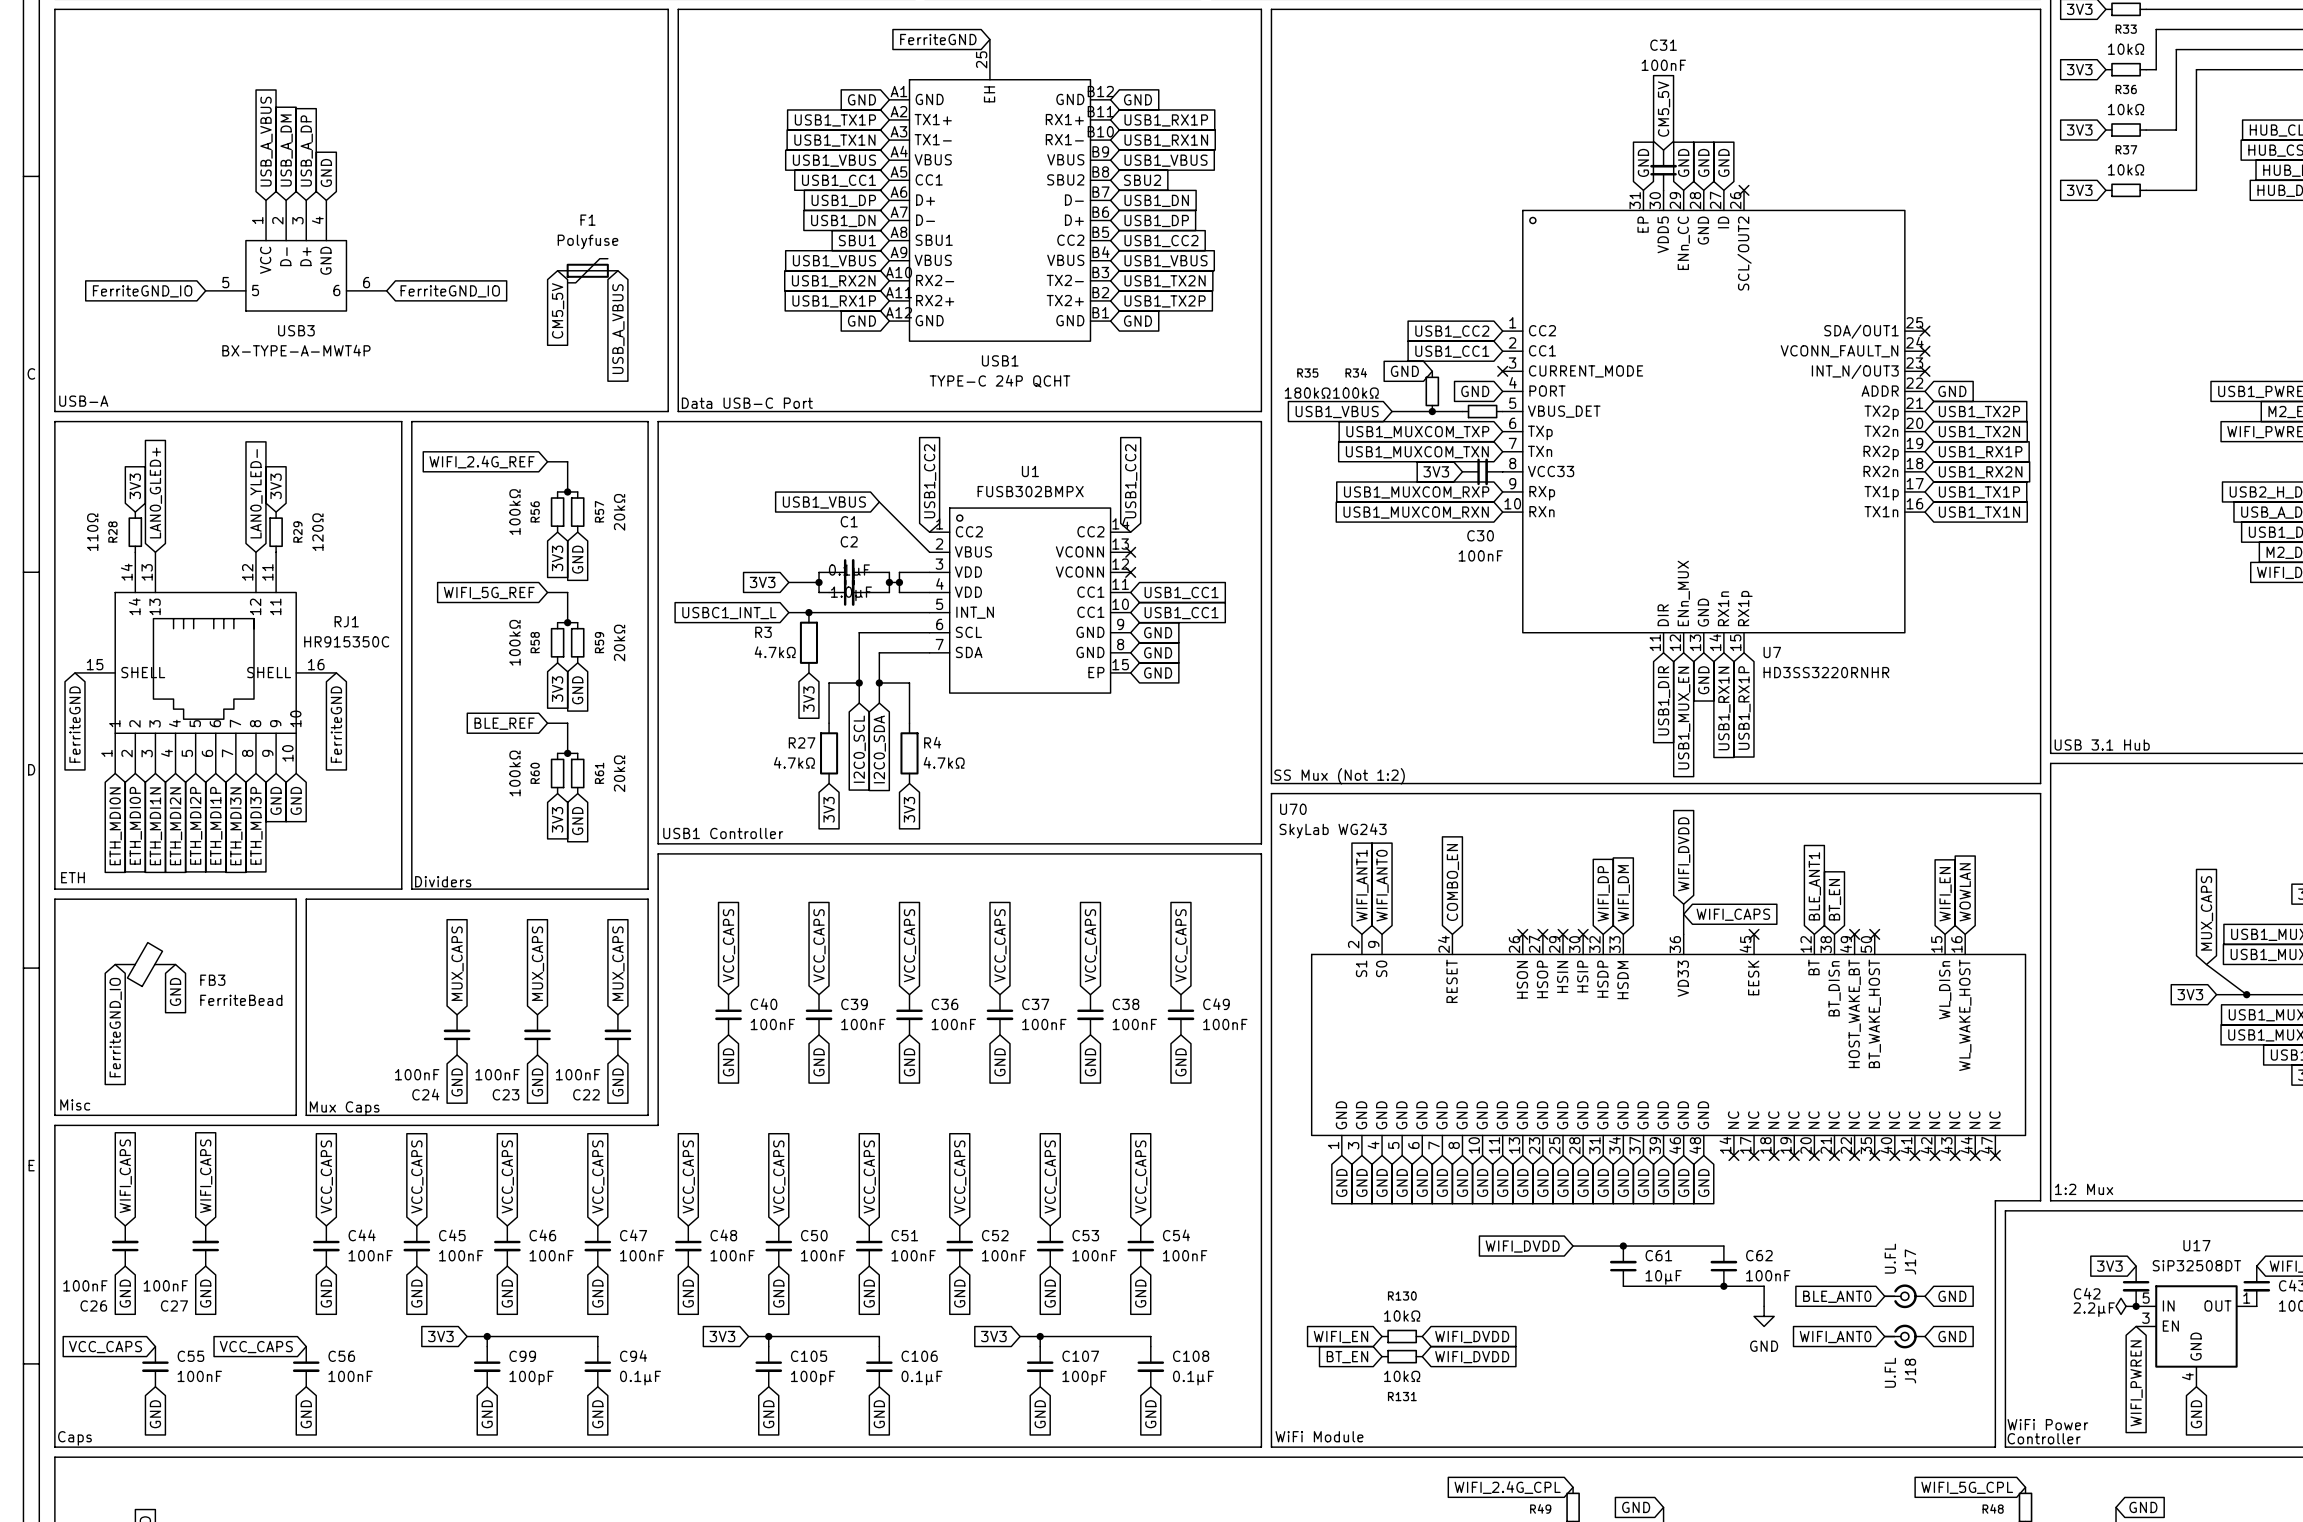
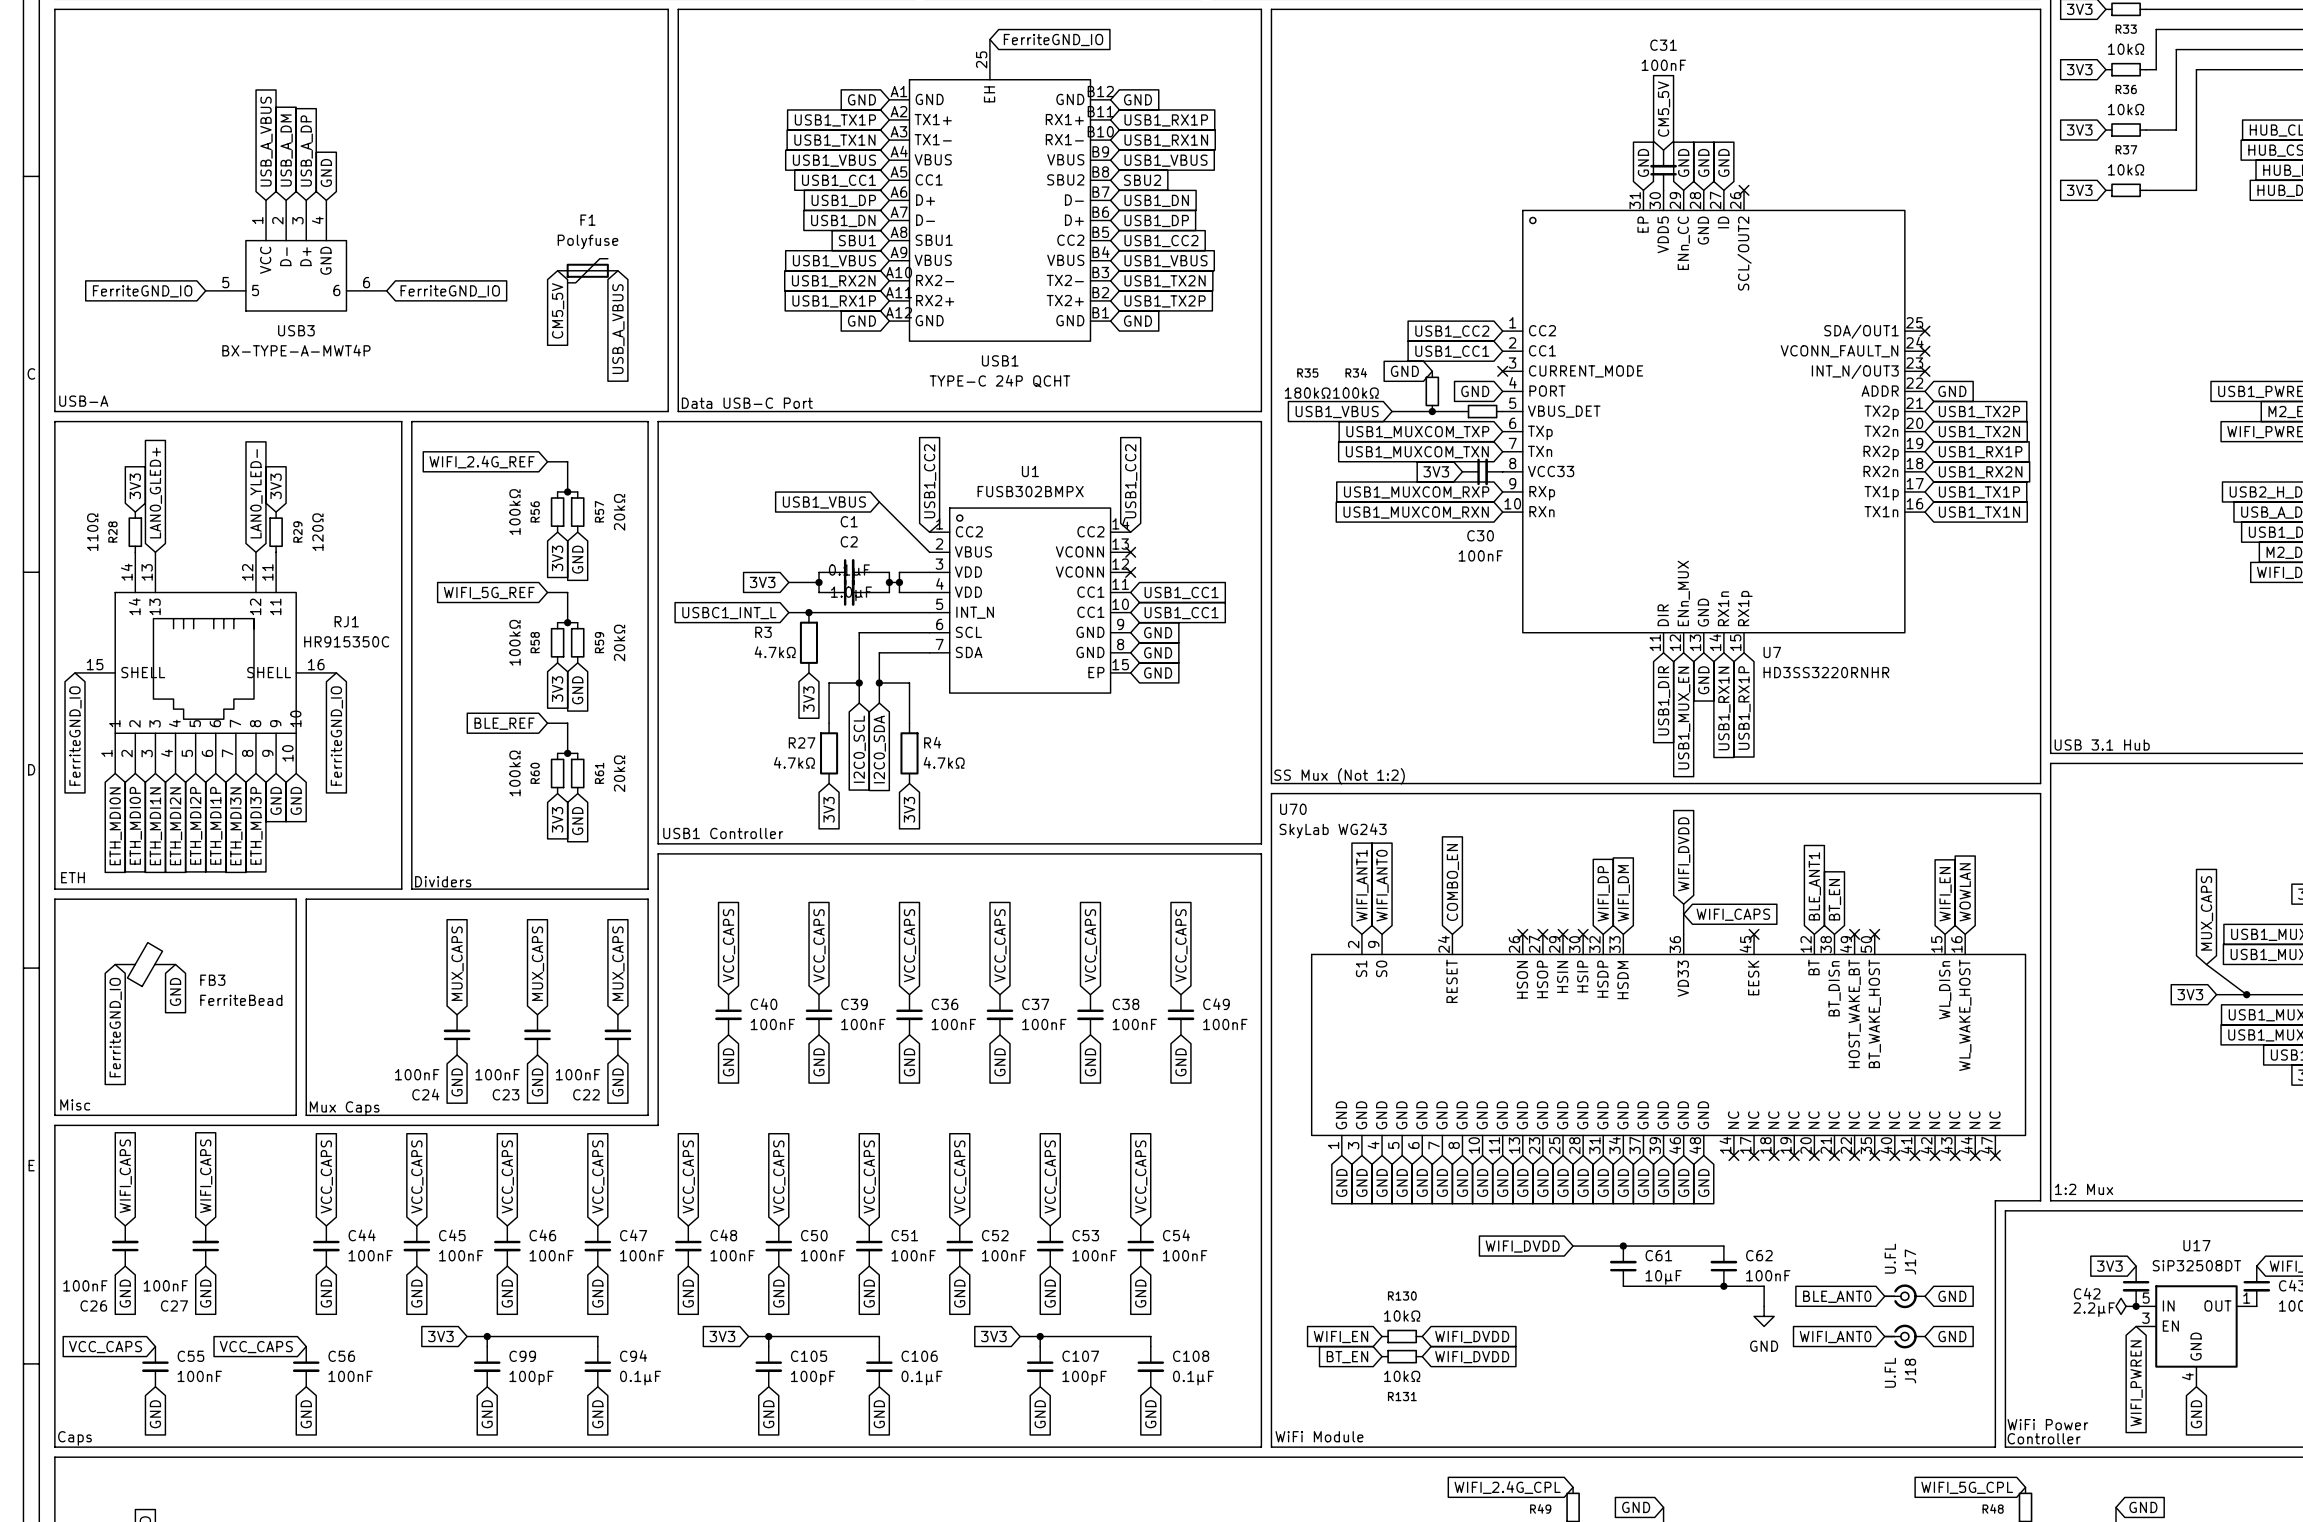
global label: FerriteGND (938, 39) -> FerriteGND_IO (1053, 40)
global label: FerriteGND (75, 724) -> FerriteGND_IO (75, 736)
global label: FerriteGND (336, 724) -> FerriteGND_IO (336, 736)

